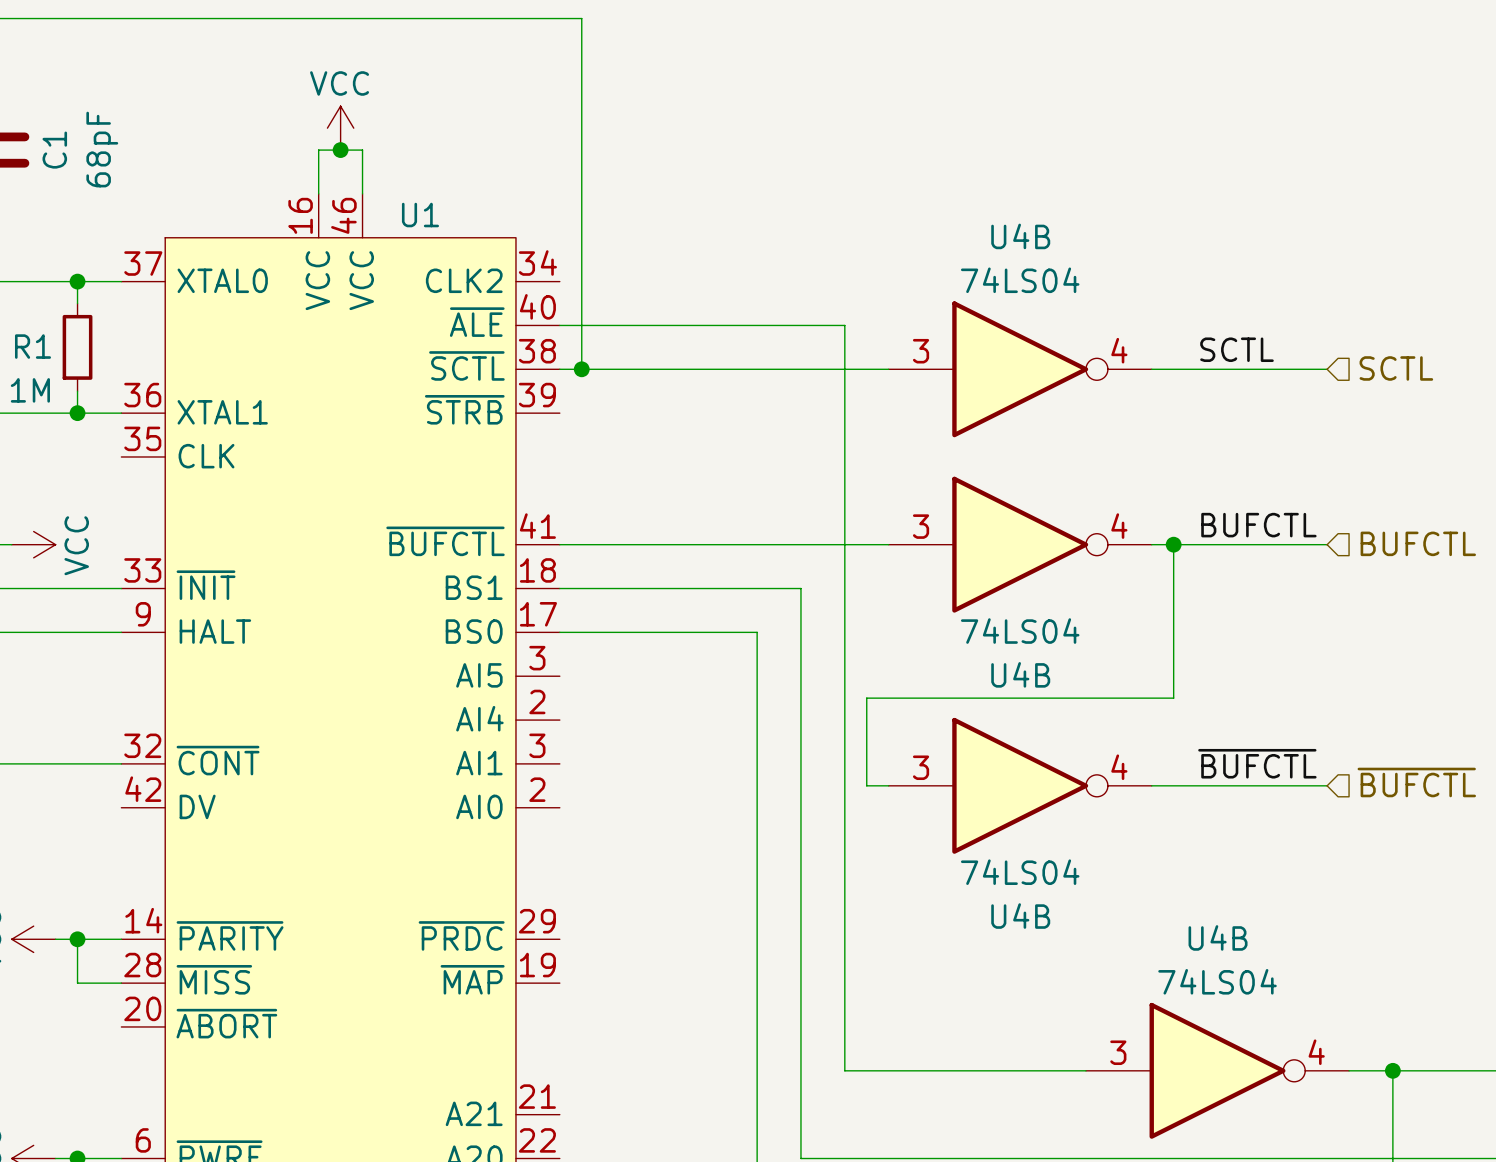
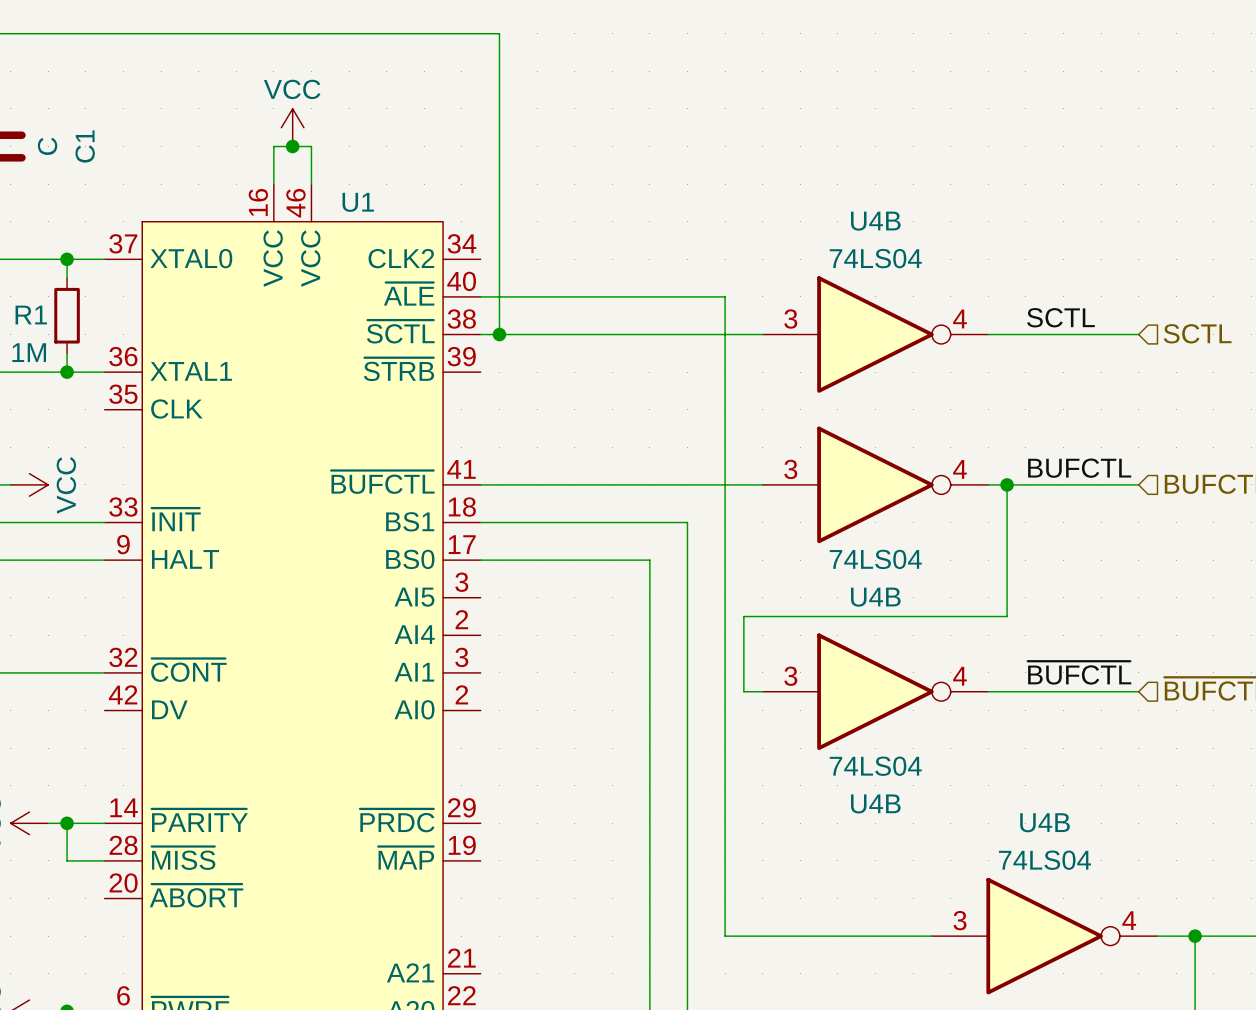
C1 value: 68pF (102, 149) -> C (47, 146)
C1 name position: C1 (54, 150) -> C1 (85, 146)

